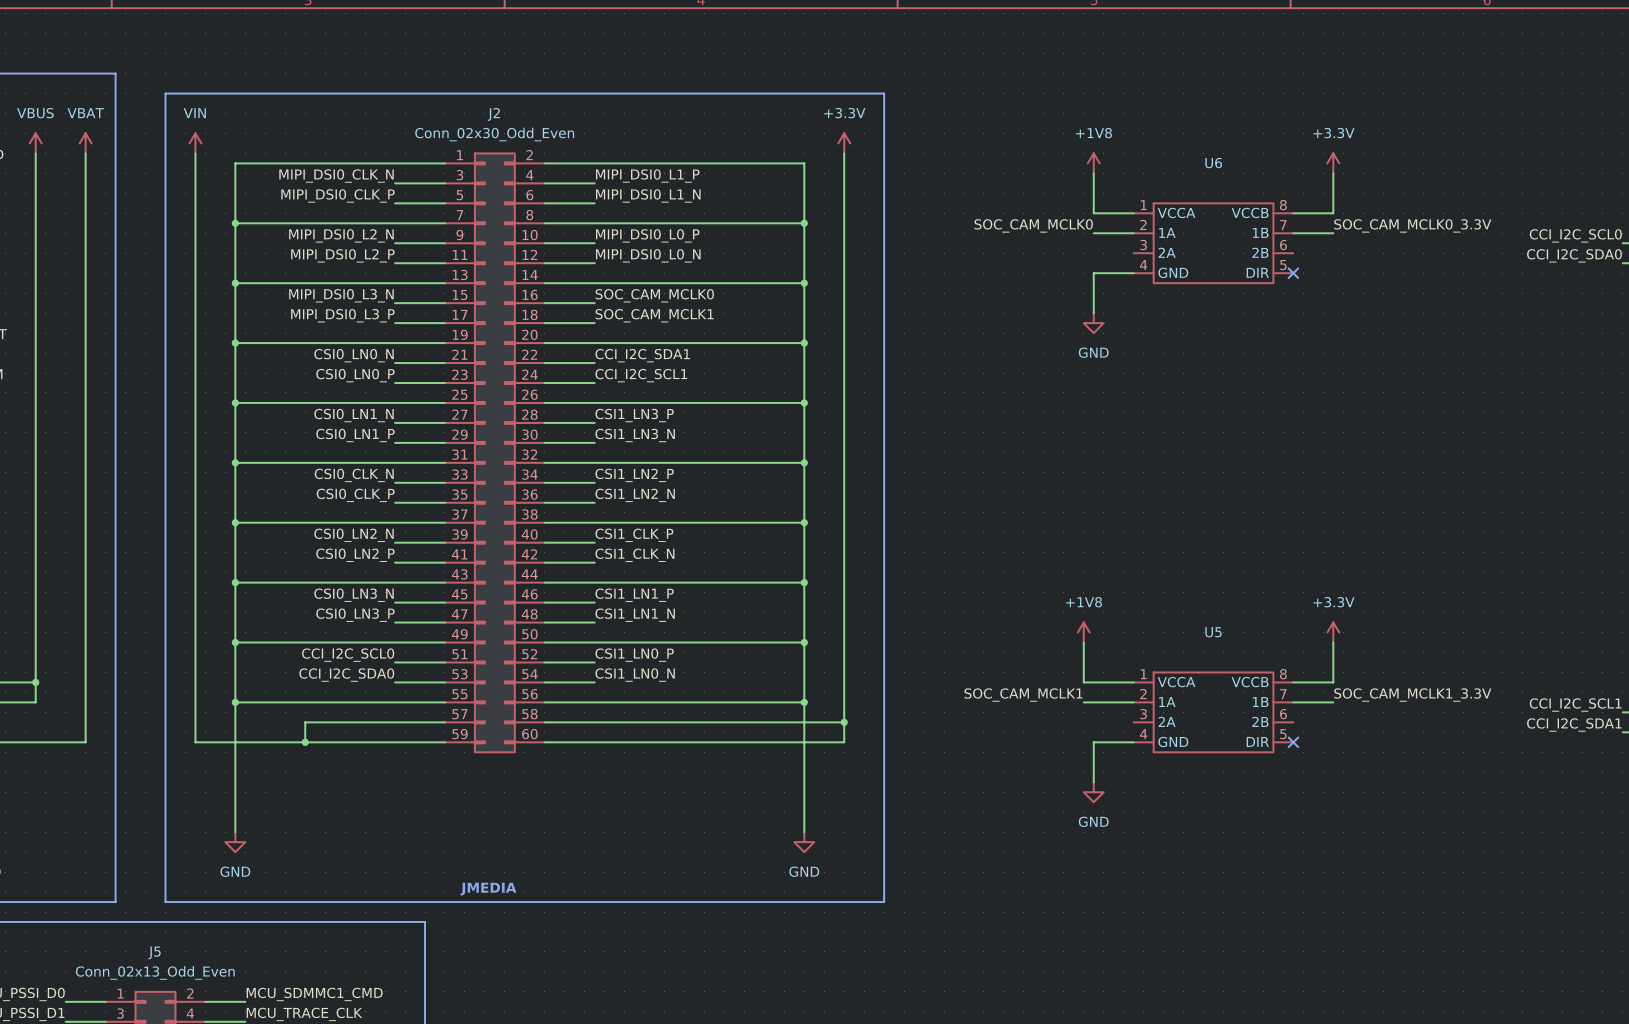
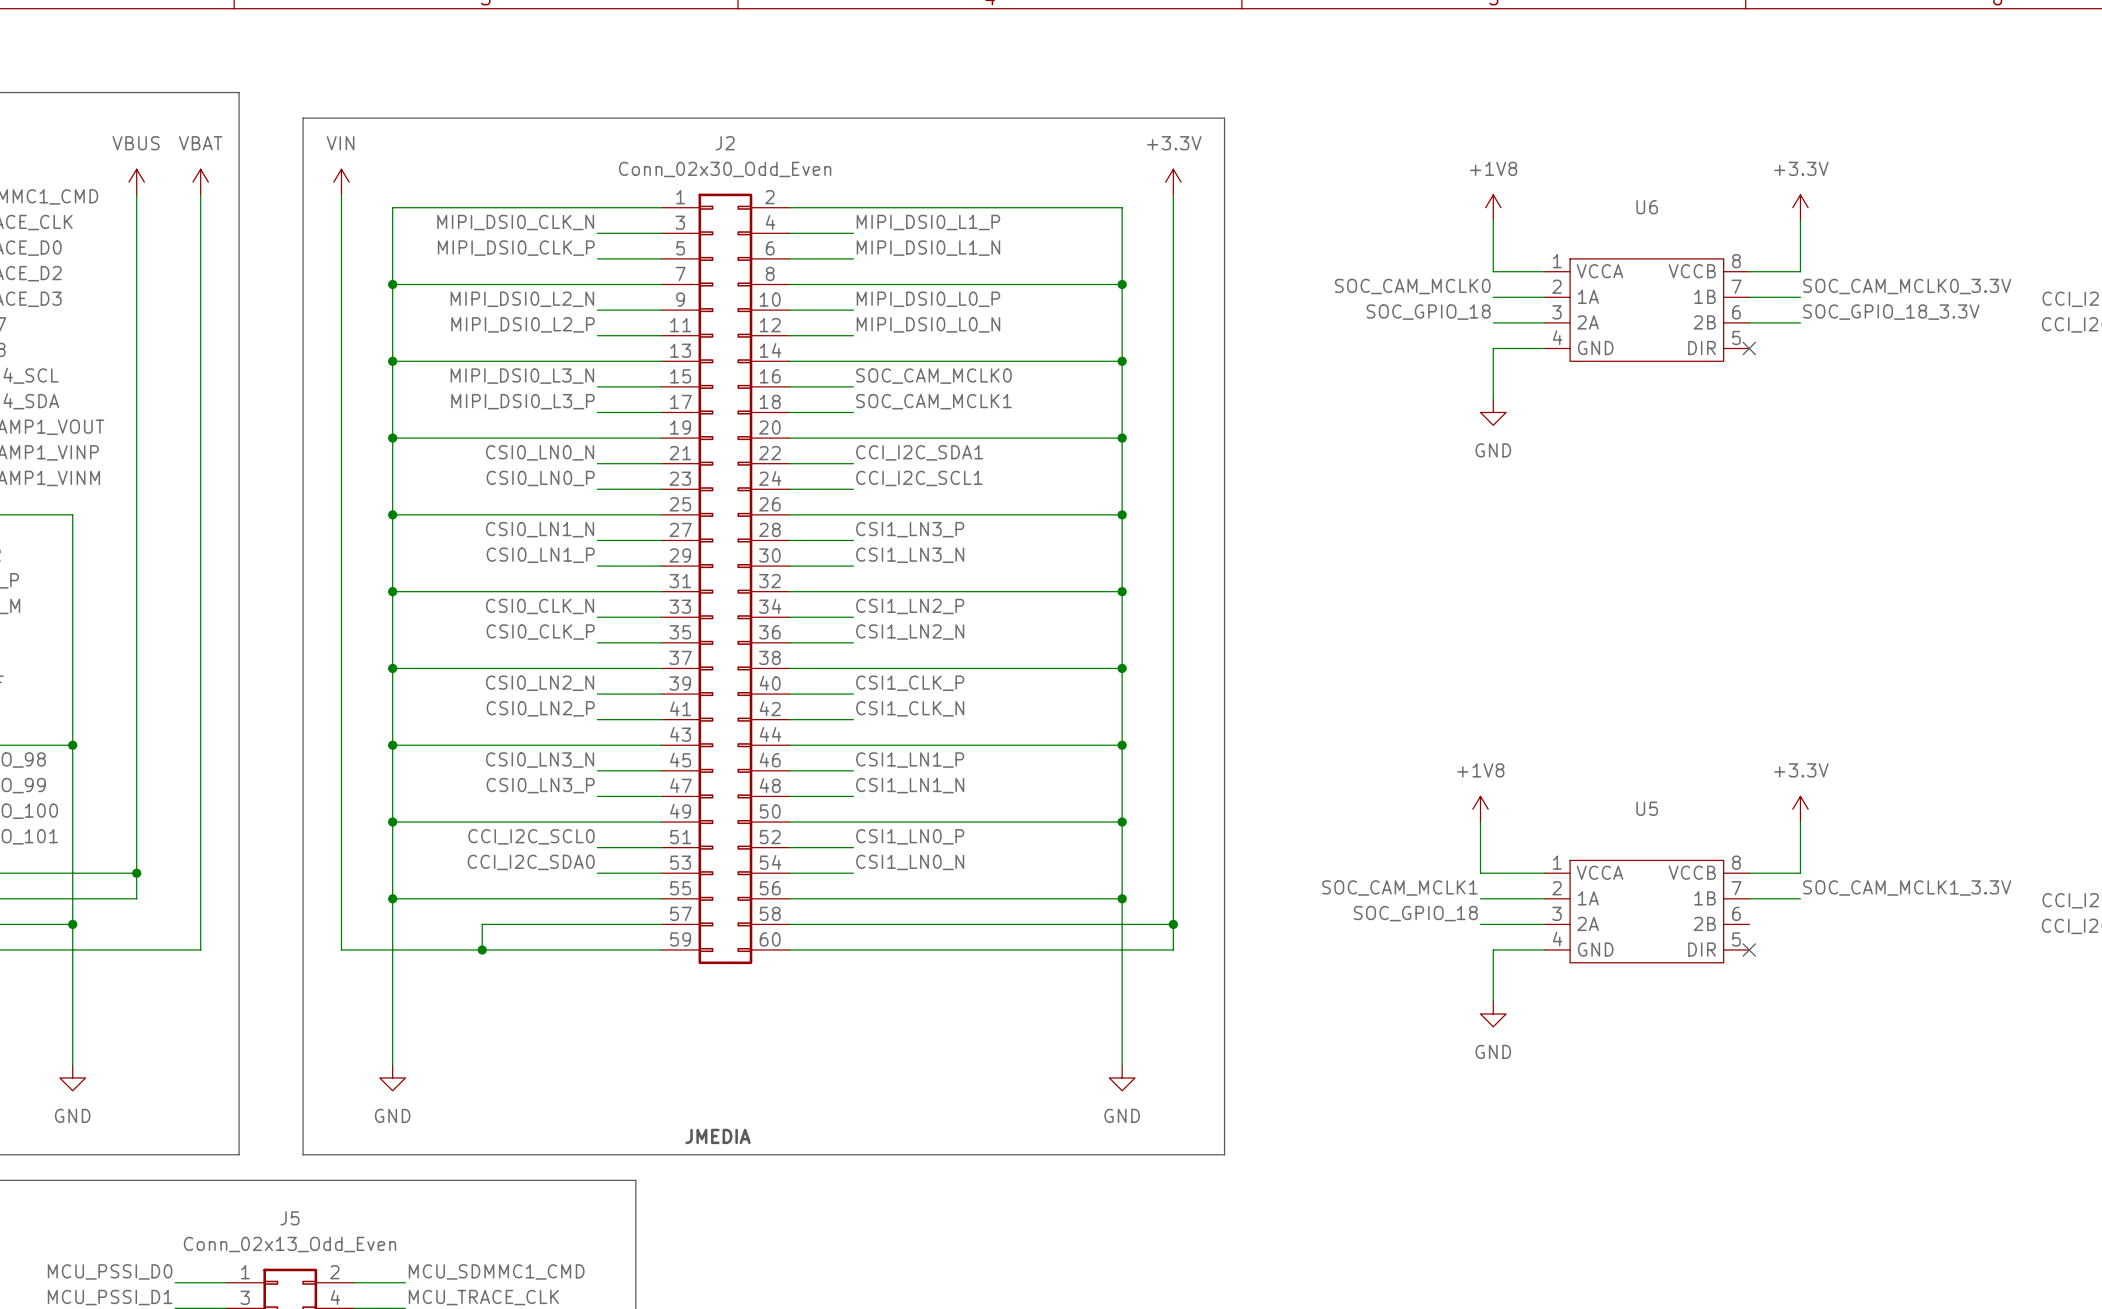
label: none -> SOC_GPIO_18 (1428, 312)
label: none -> SOC_GPIO_18_3.3V (1891, 312)
wire: none -> (1493, 322) (1544, 322)
wire: none -> (1749, 322) (1800, 322)
label: none -> SOC_GPIO_18 (1415, 913)
wire: none -> (1480, 924) (1544, 924)

